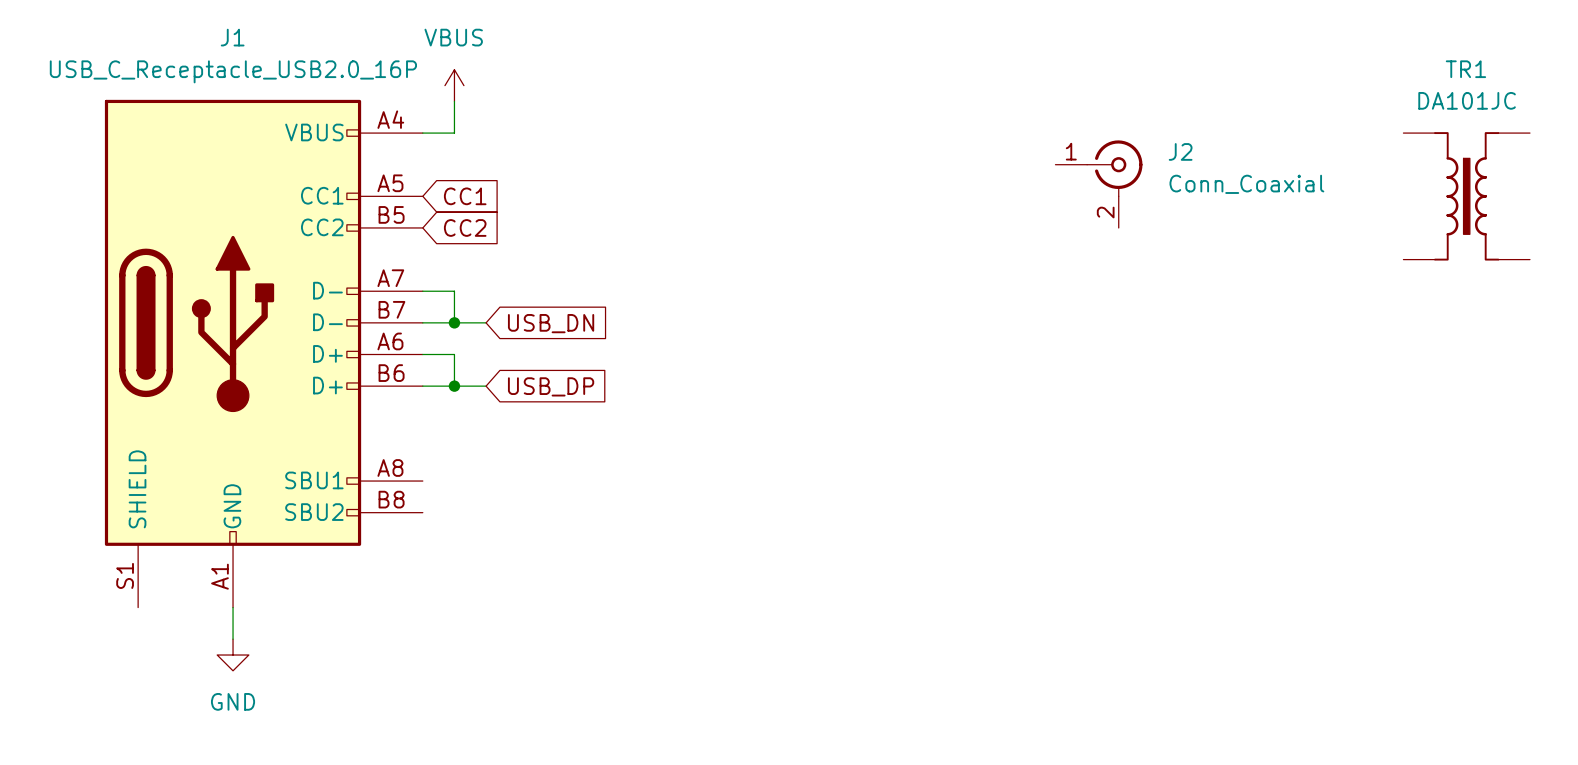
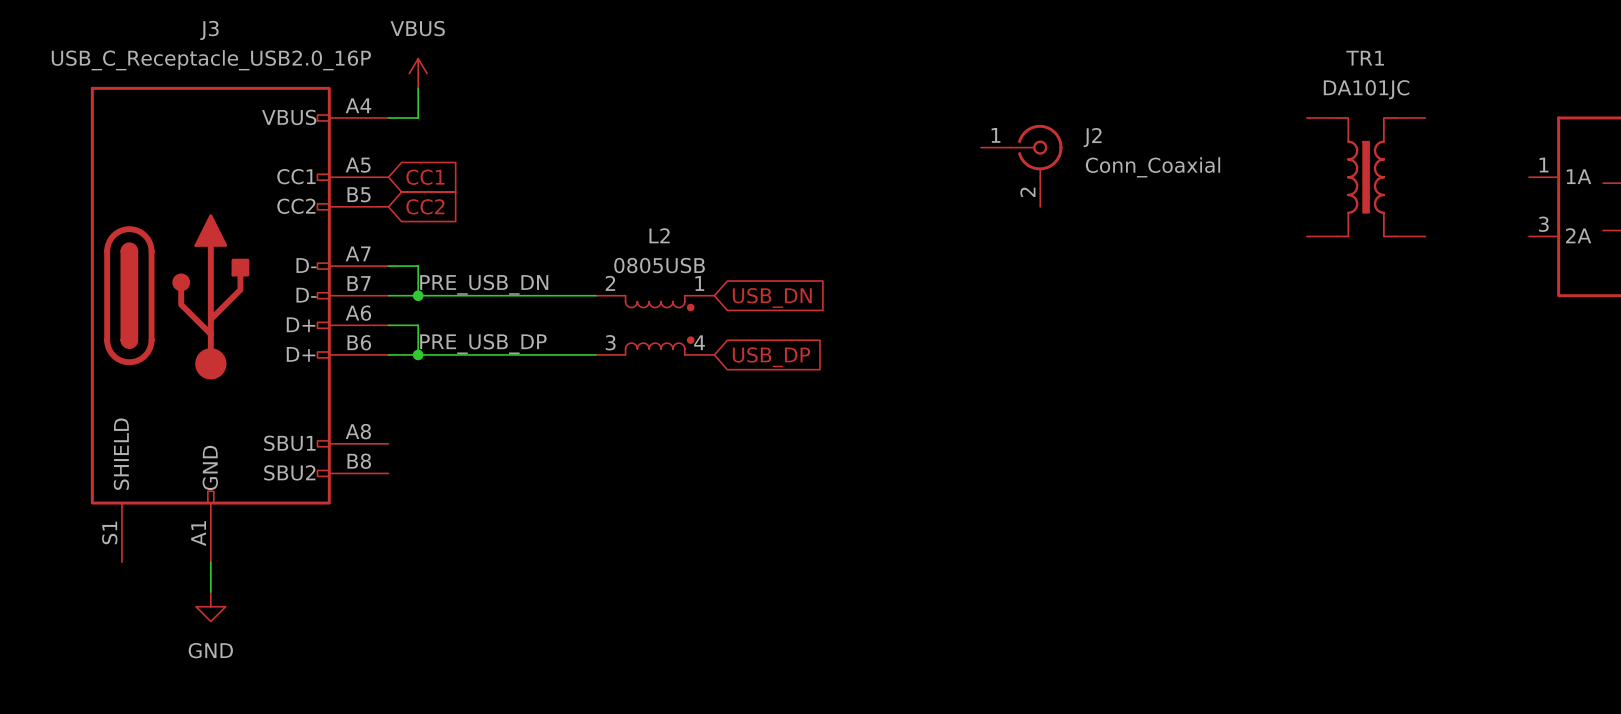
J1 name: J1 (232, 37) -> J3 (209, 30)
label: none -> PRE_USB_DN (484, 284)
wire: none -> (447, 295) (595, 295)
global label position: USB_DN (551, 323) -> USB_DN (772, 297)
L2: none -> 0805USB (655, 325)
label: none -> PRE_USB_DP (483, 344)
wire: none -> (447, 354) (595, 354)
global label position: USB_DP (551, 386) -> USB_DP (771, 357)

